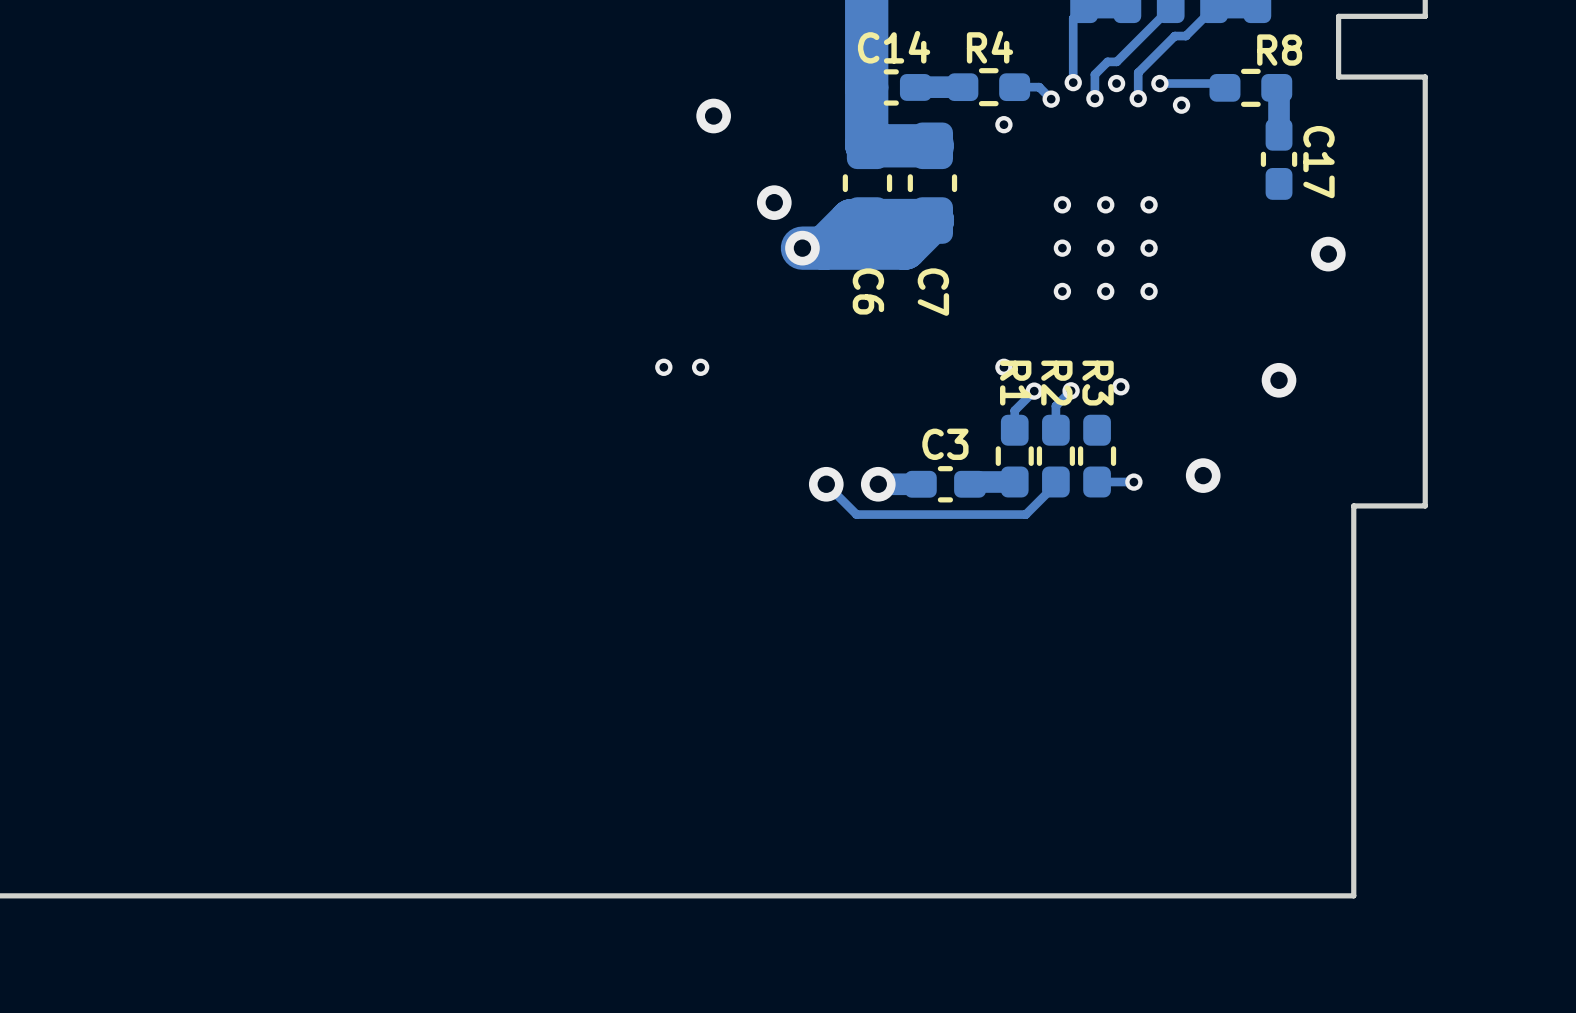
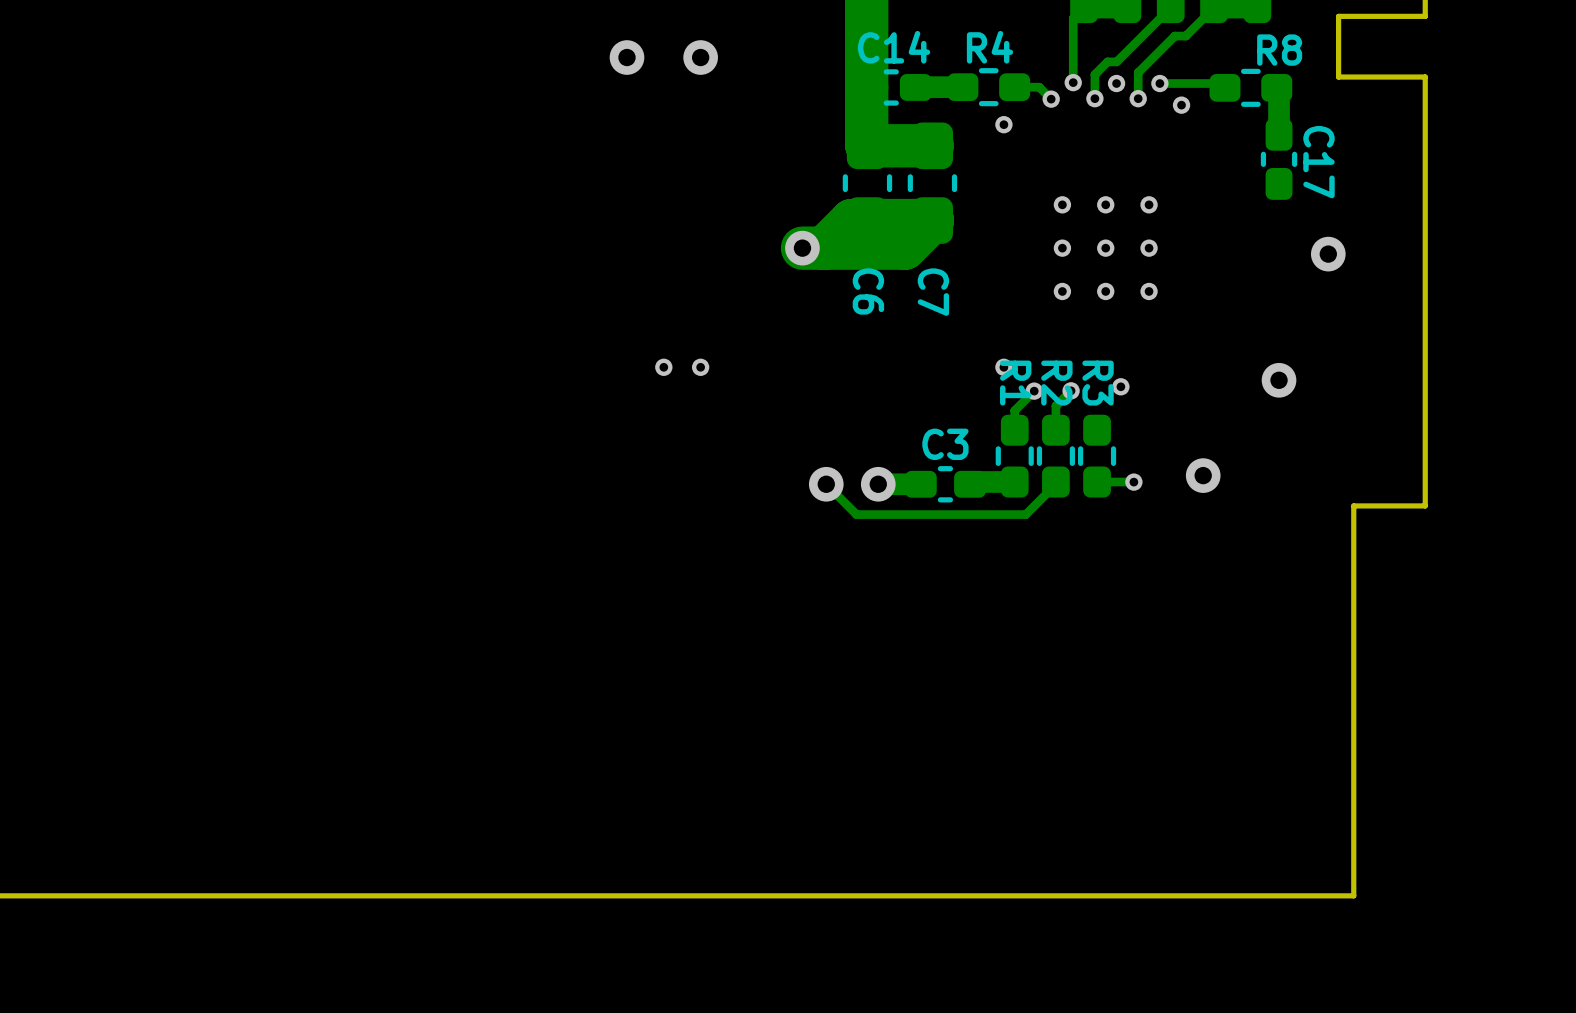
via: none -> (626, 57)
via: none -> (700, 57)
via: (713, 116) -> none
via: (774, 202) -> none

